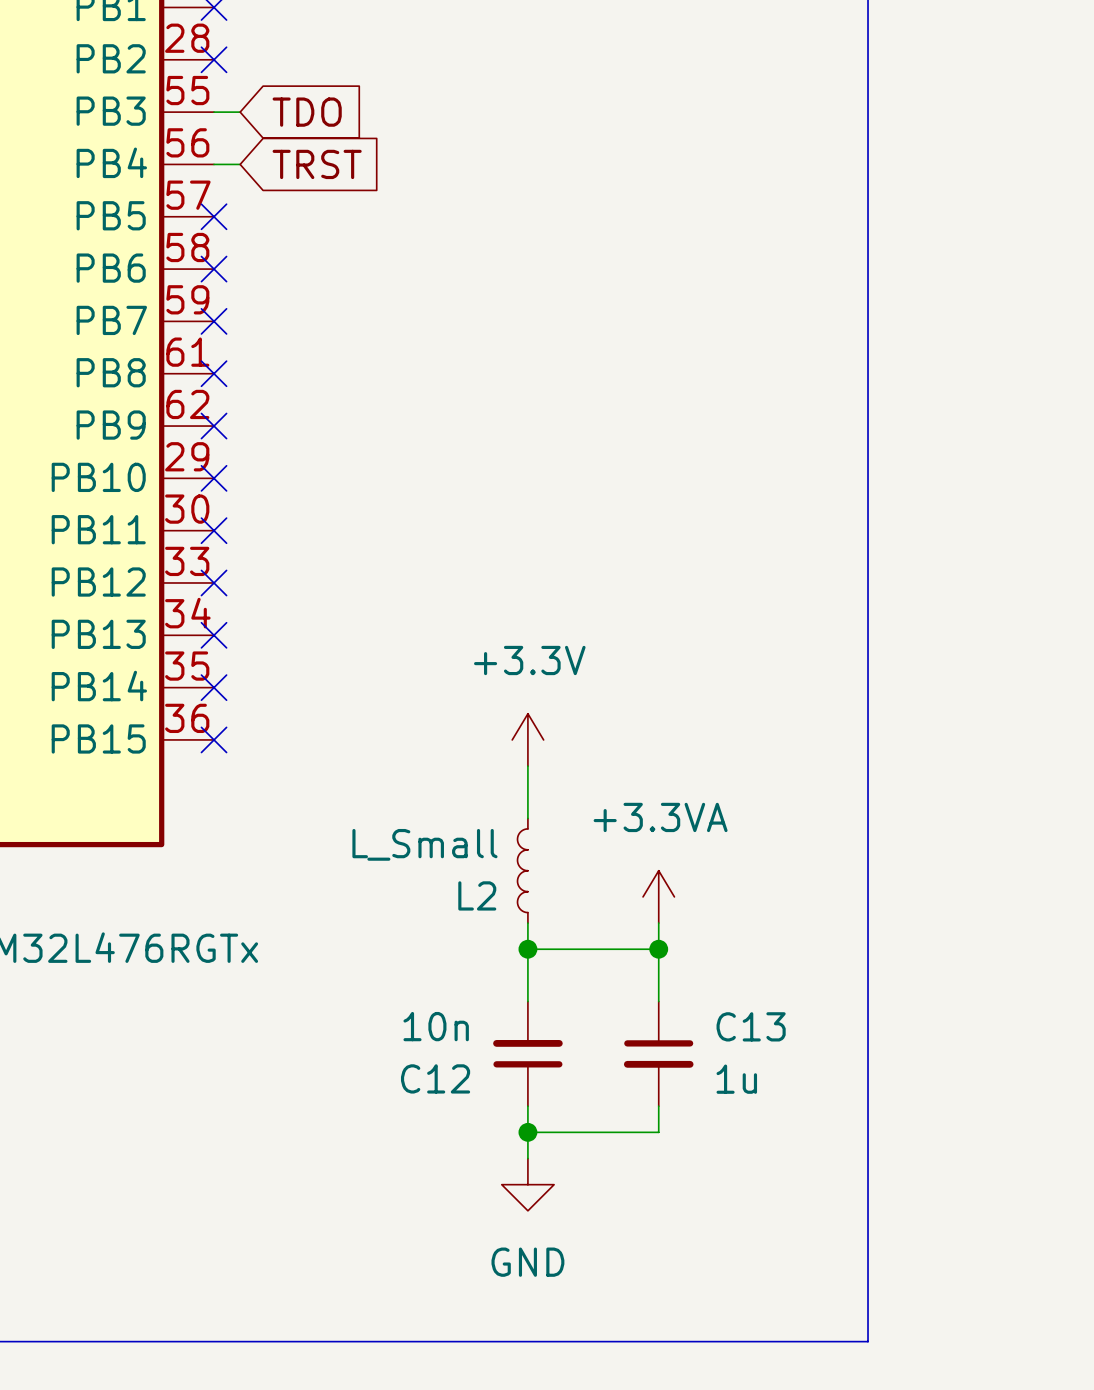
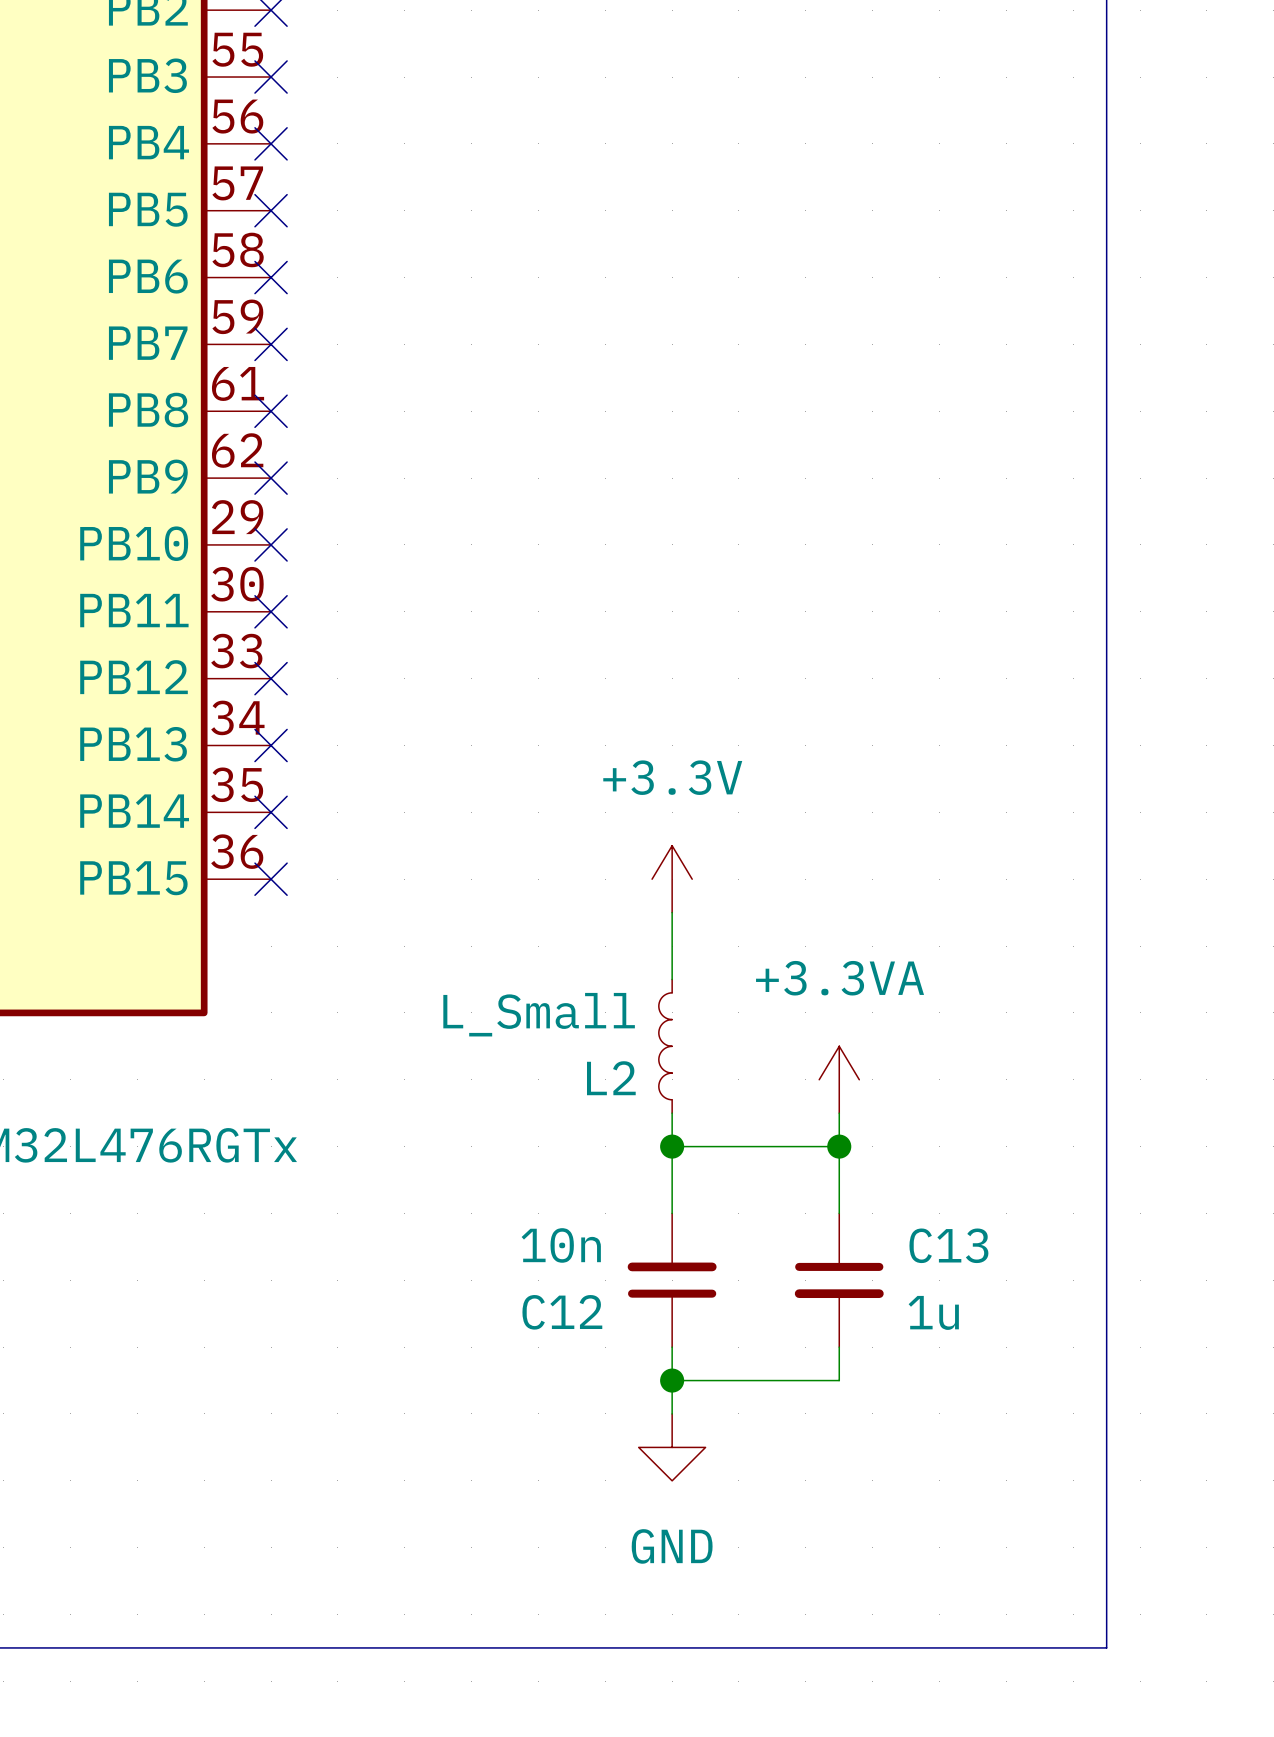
wire: (214, 112) (240, 112) -> none
no-connect mark: none -> (271, 77)
global label: TDO (307, 112) -> none
wire: (214, 164) (240, 164) -> none
no-connect mark: none -> (271, 143)
global label: TRST (317, 164) -> none

